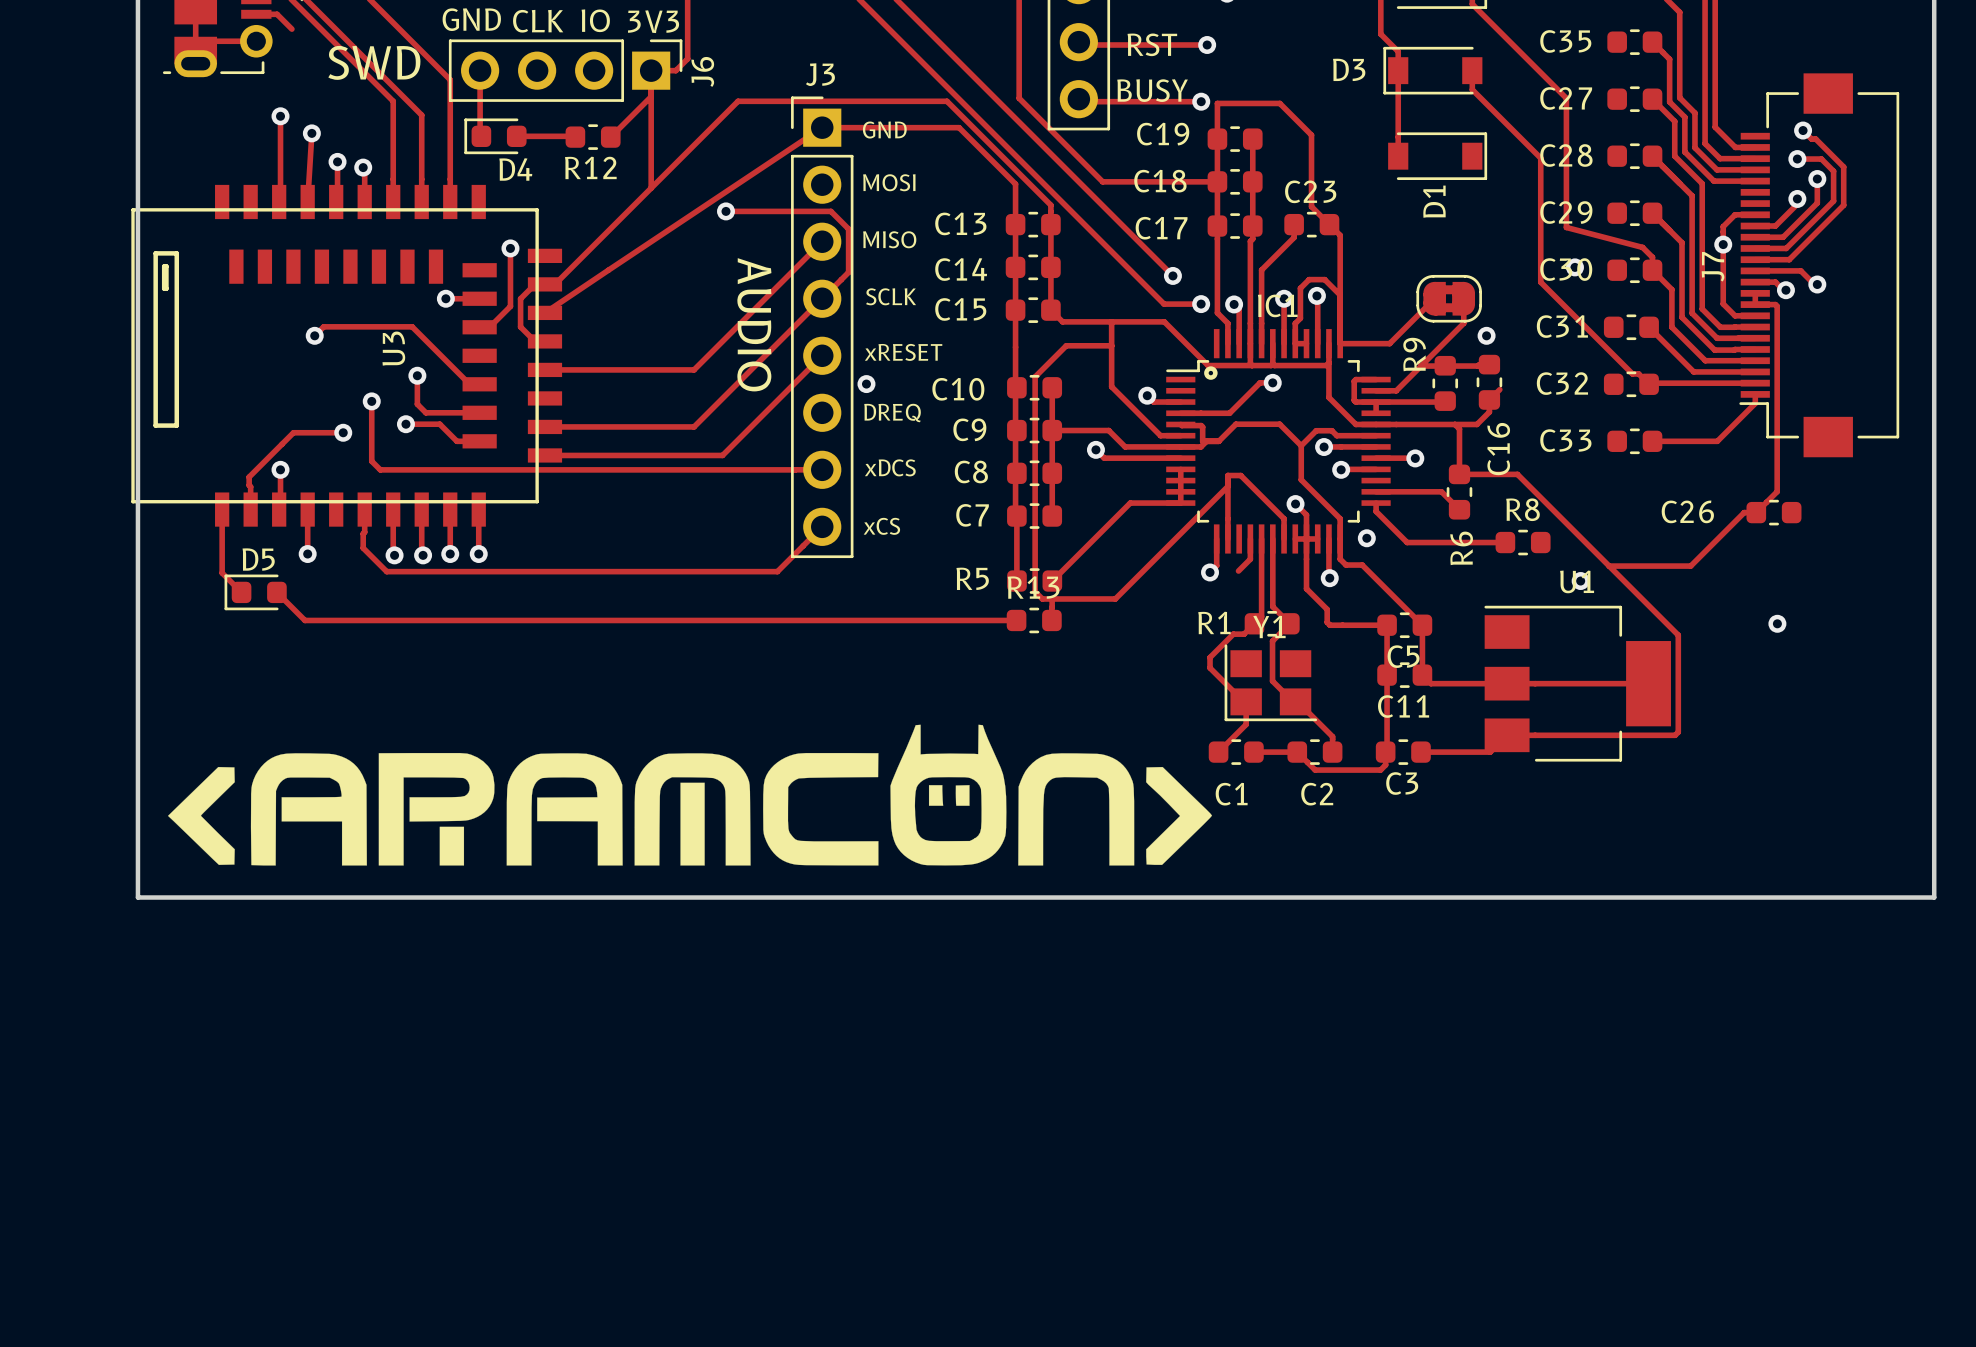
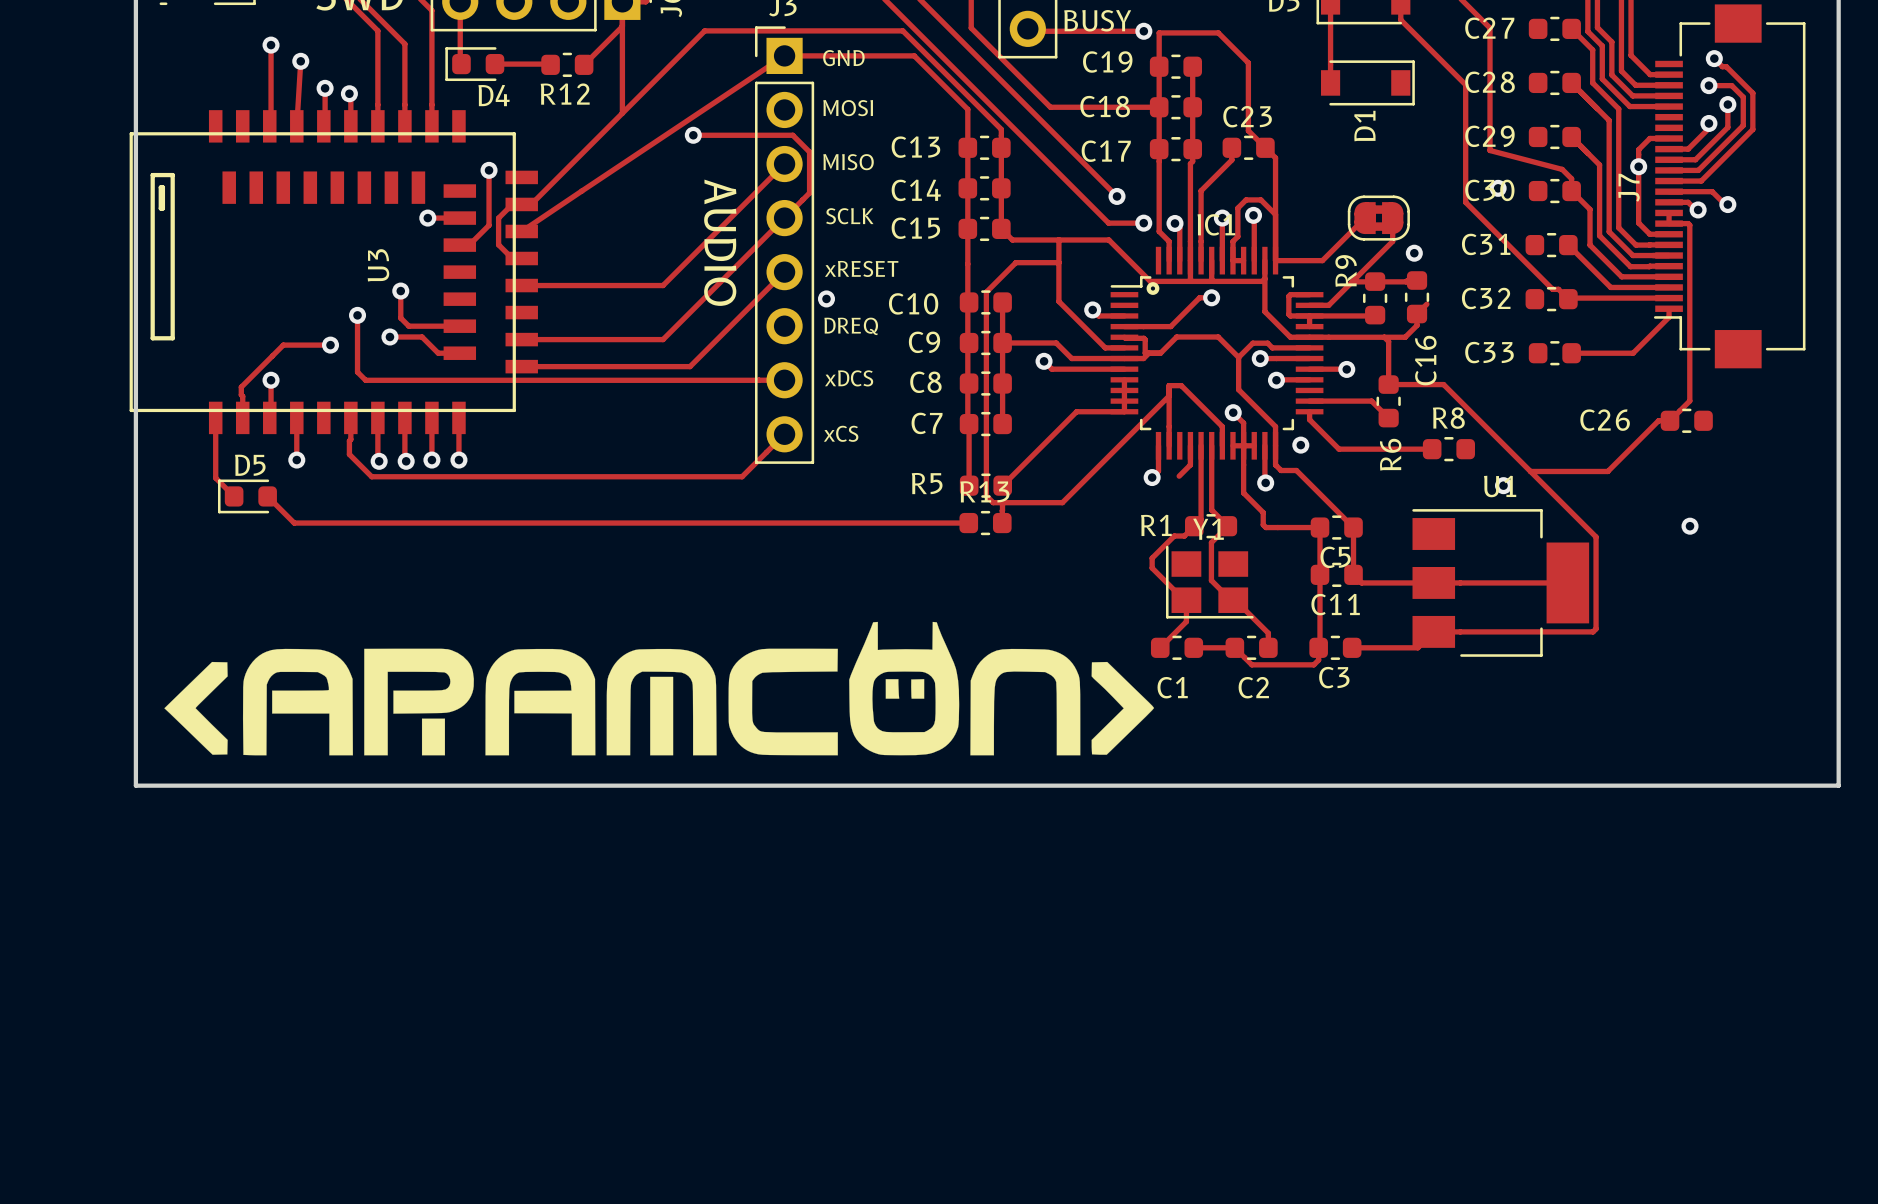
track: (314, 335) (323, 326) (412, 326) (469, 384) (479, 384) -> none
via: (314, 335) -> none

